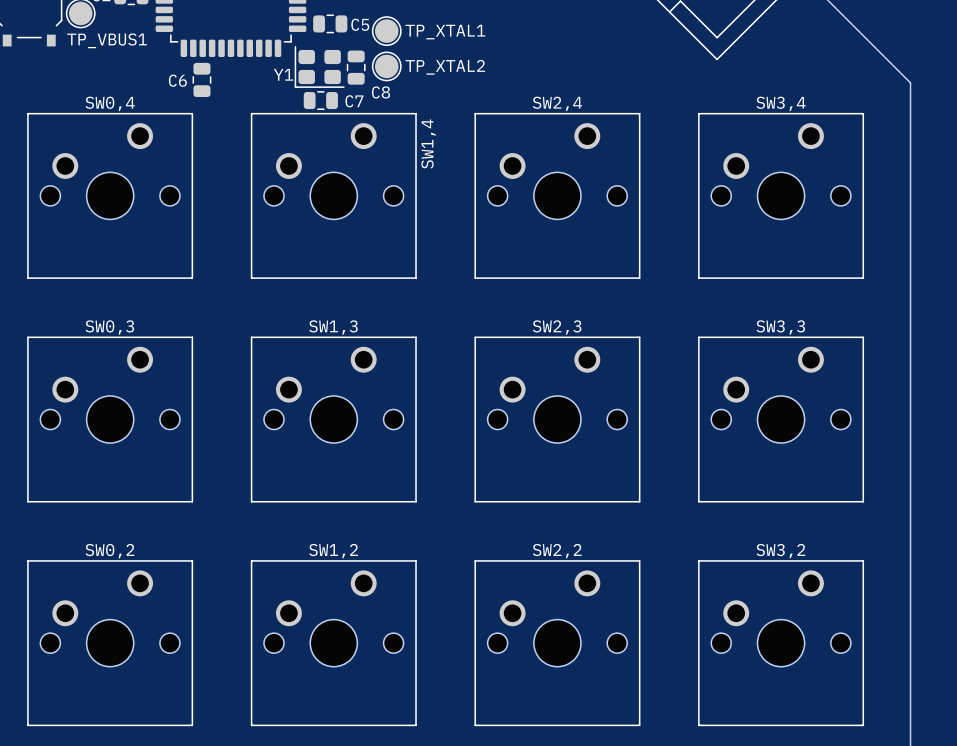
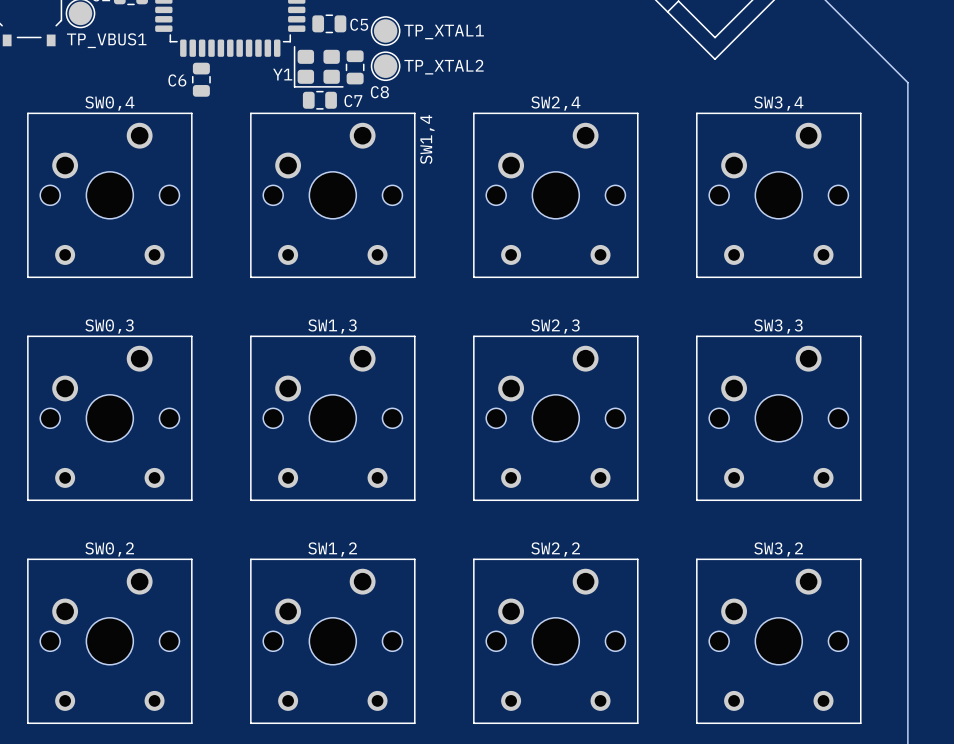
SW0,4 footprint: [27, 112, 194, 279] -> [27, 112, 193, 279]
SW1,4 footprint: [250, 112, 417, 279] -> [250, 112, 416, 279]
SW2,4 footprint: [474, 112, 641, 279] -> [473, 112, 639, 279]
SW3,4 footprint: [698, 112, 864, 279] -> [696, 112, 862, 279]
SW0,3 footprint: [27, 336, 194, 503] -> [27, 335, 193, 501]
SW1,3 footprint: [250, 336, 417, 503] -> [250, 335, 416, 501]
SW2,3 footprint: [474, 336, 641, 503] -> [473, 335, 639, 501]
SW3,3 footprint: [698, 336, 864, 503] -> [696, 335, 862, 501]
SW0,2 footprint: [27, 560, 194, 727] -> [27, 558, 193, 724]
SW1,2 footprint: [250, 560, 417, 727] -> [250, 558, 416, 724]
SW2,2 footprint: [474, 560, 641, 727] -> [473, 558, 639, 724]
SW3,2 footprint: [698, 560, 864, 727] -> [696, 558, 862, 724]

